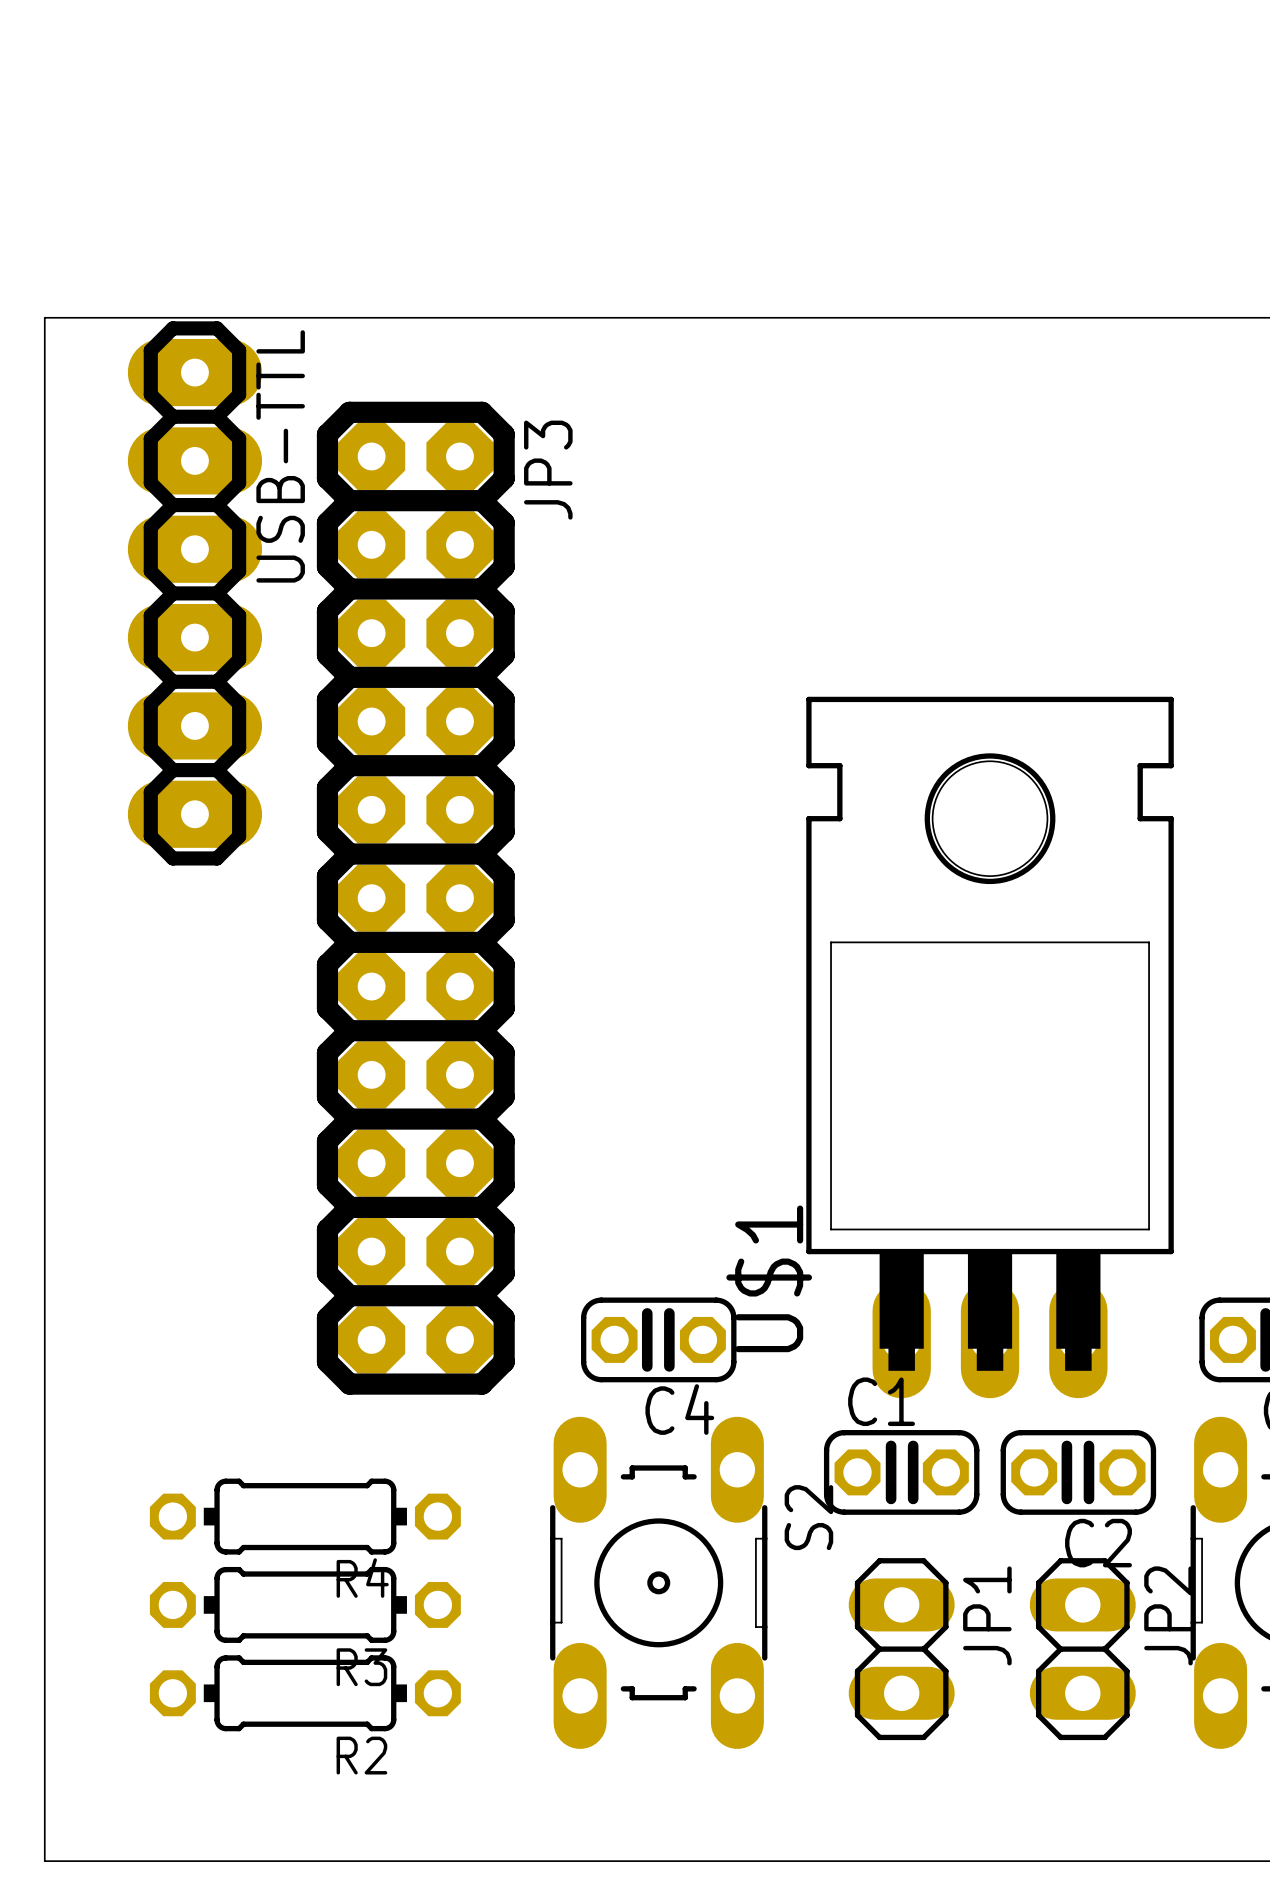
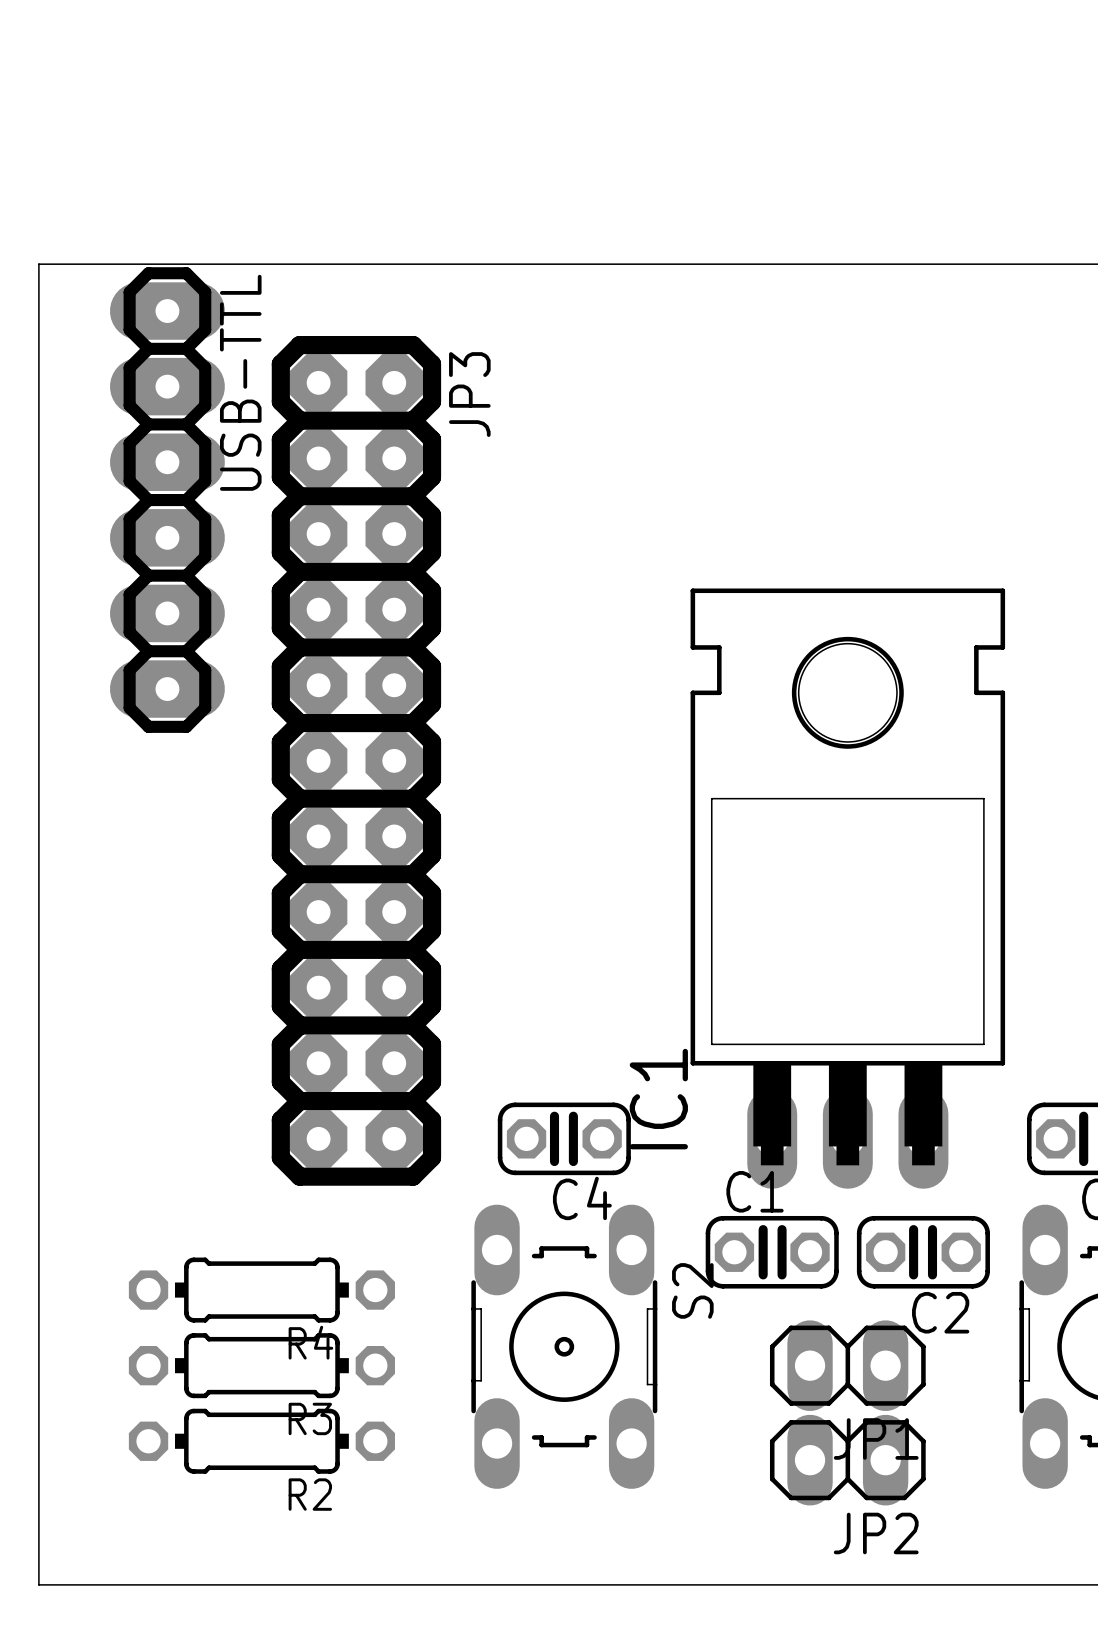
U$1 name: U$1 (769, 1278) -> IC1 (658, 1099)
JP1 rotation: 0° (901, 1649) -> 90° clockwise (847, 1365)
JP2 rotation: 0° (1082, 1649) -> 90° clockwise (847, 1460)
JP2 position: (1082, 1649) -> (847, 1460)

